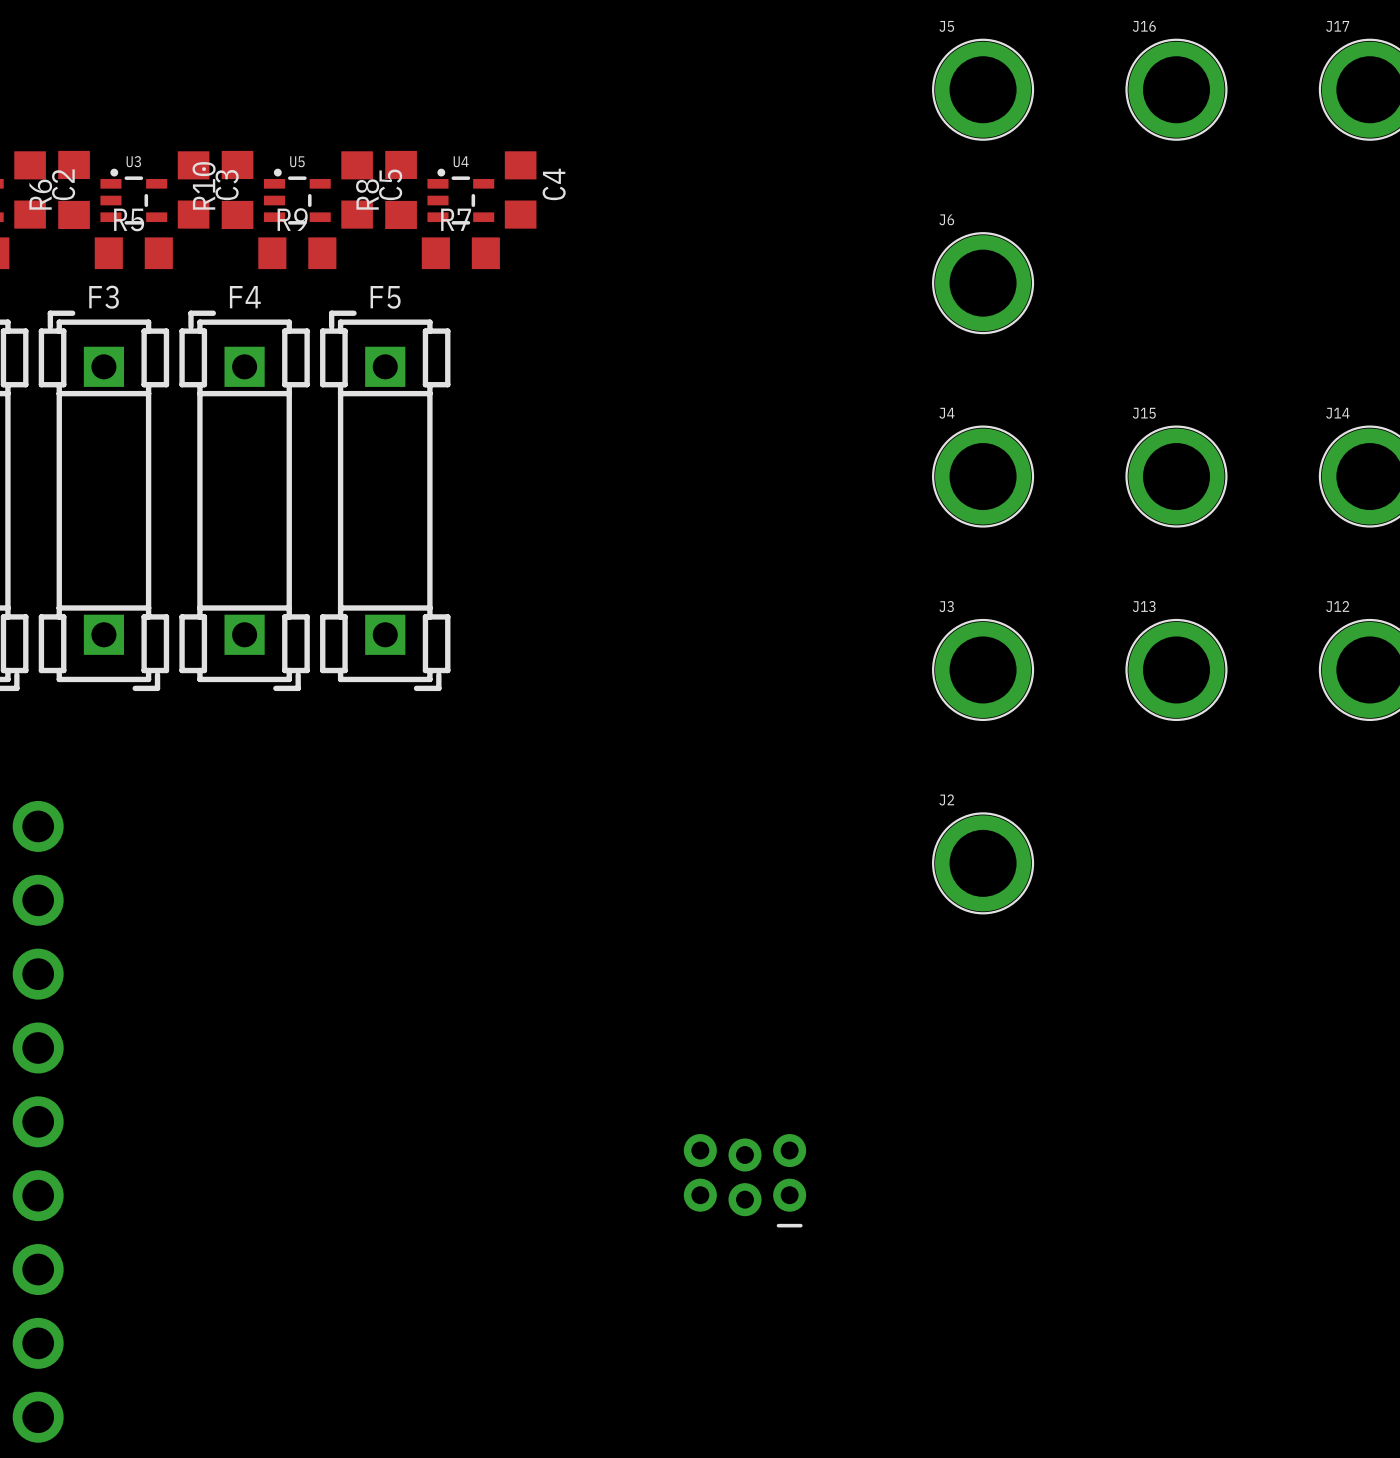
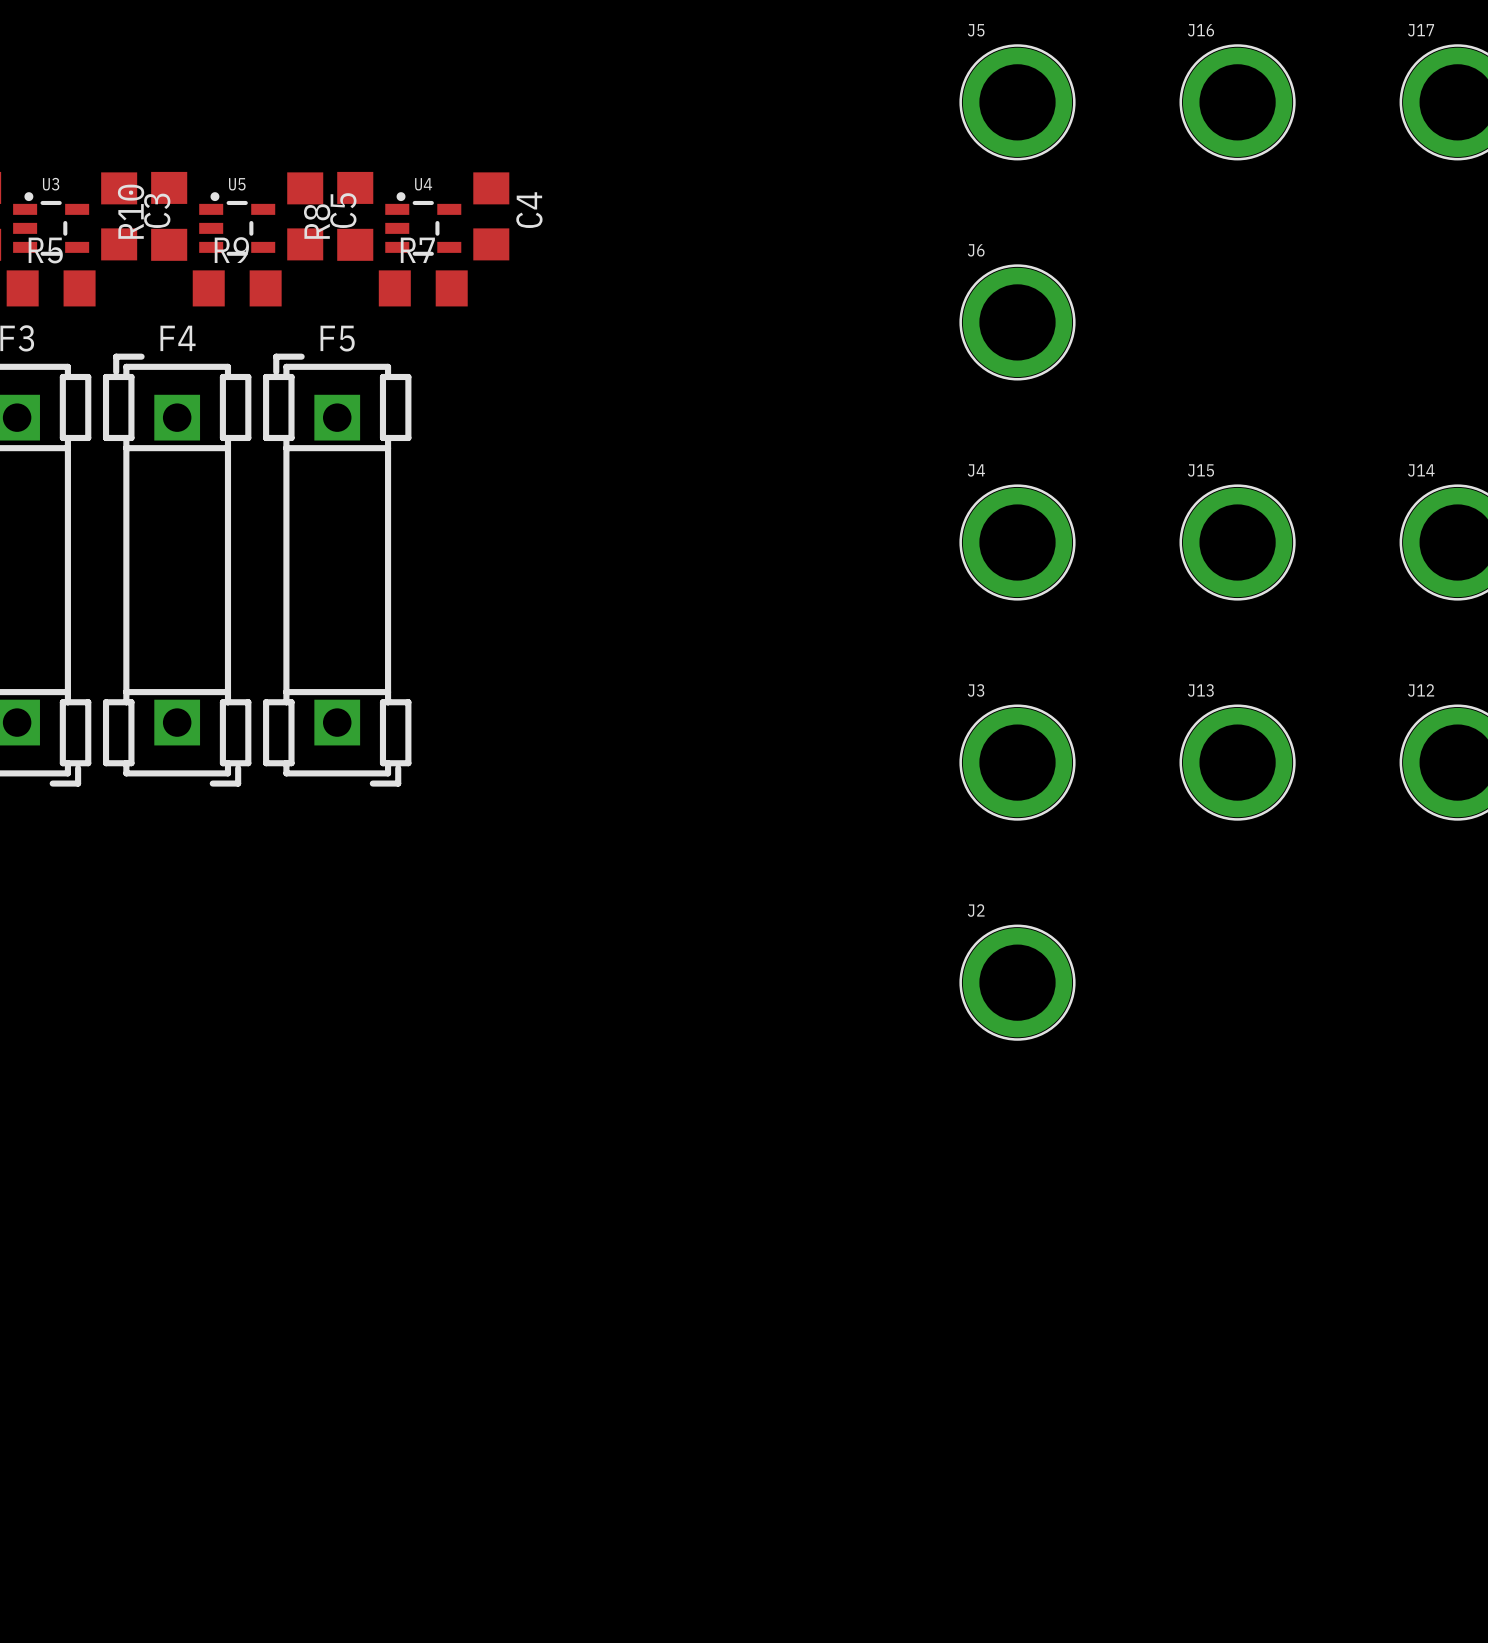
part: (744, 1180) -> none

